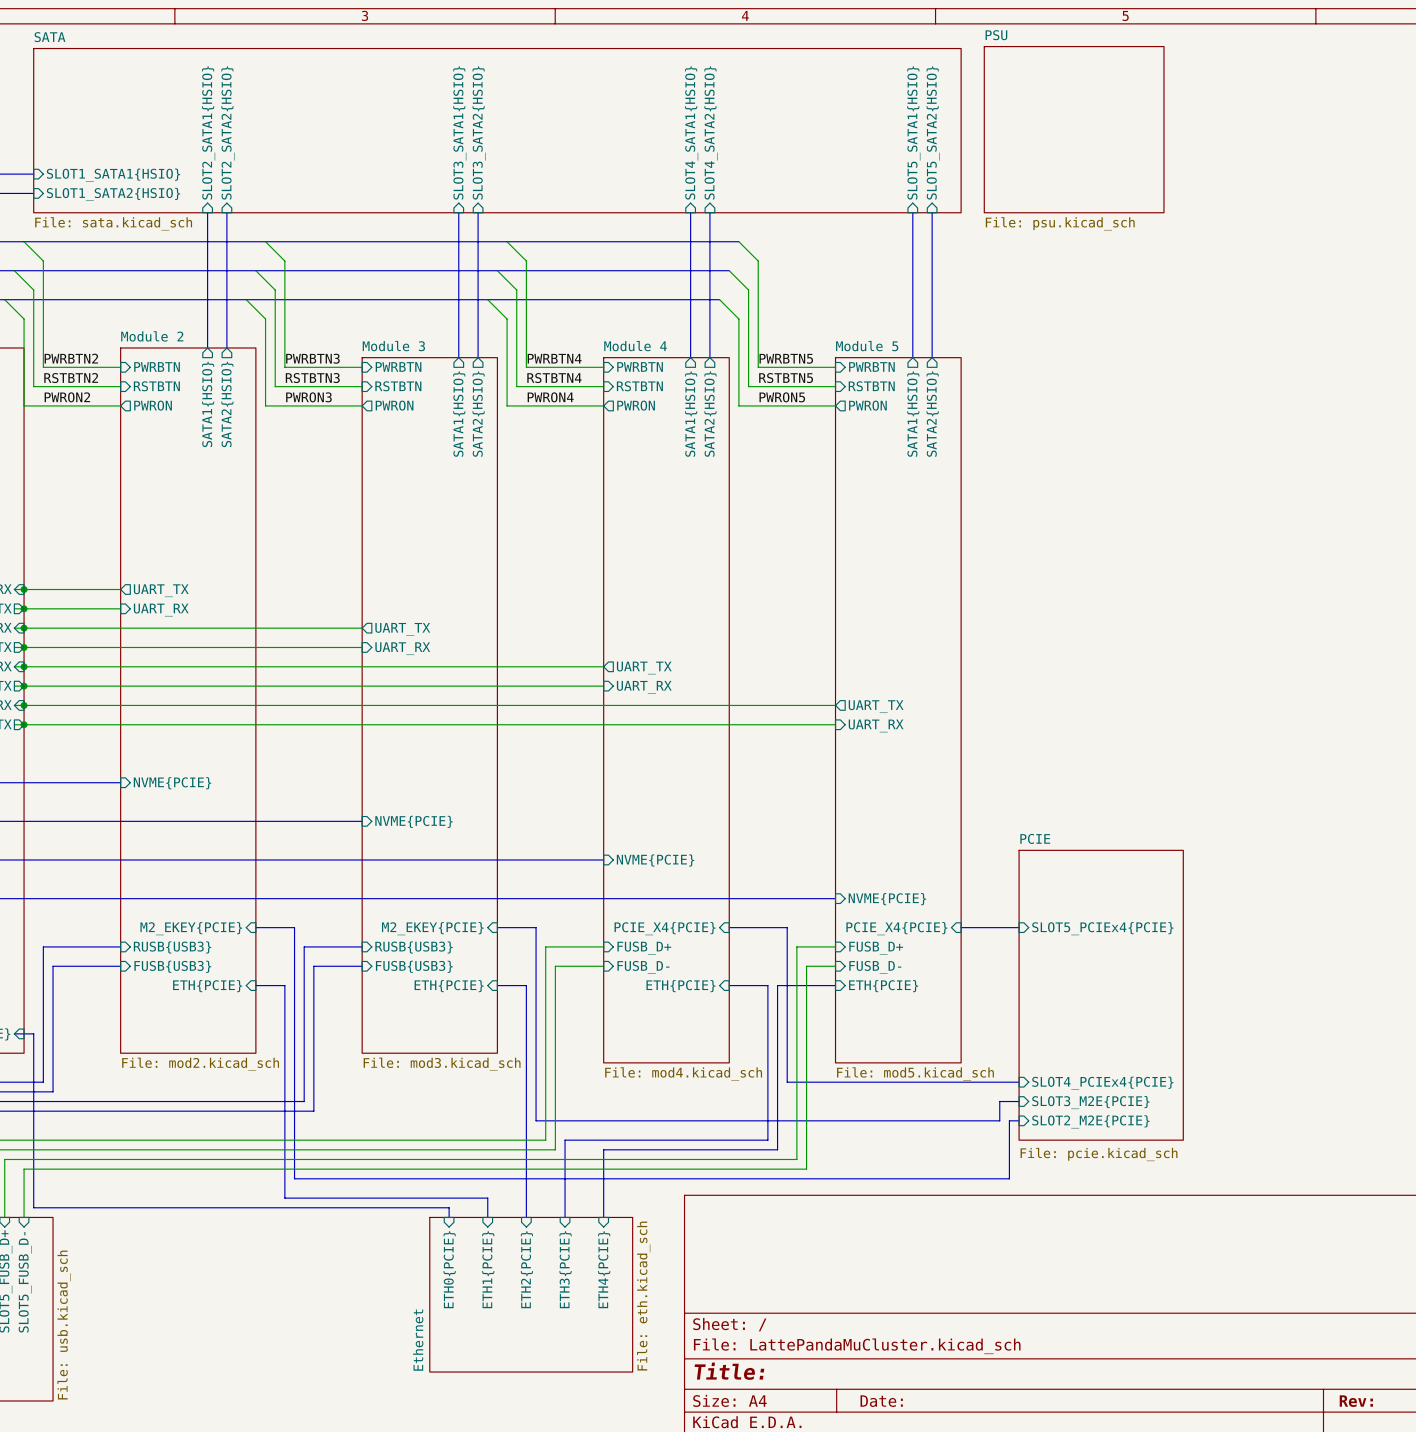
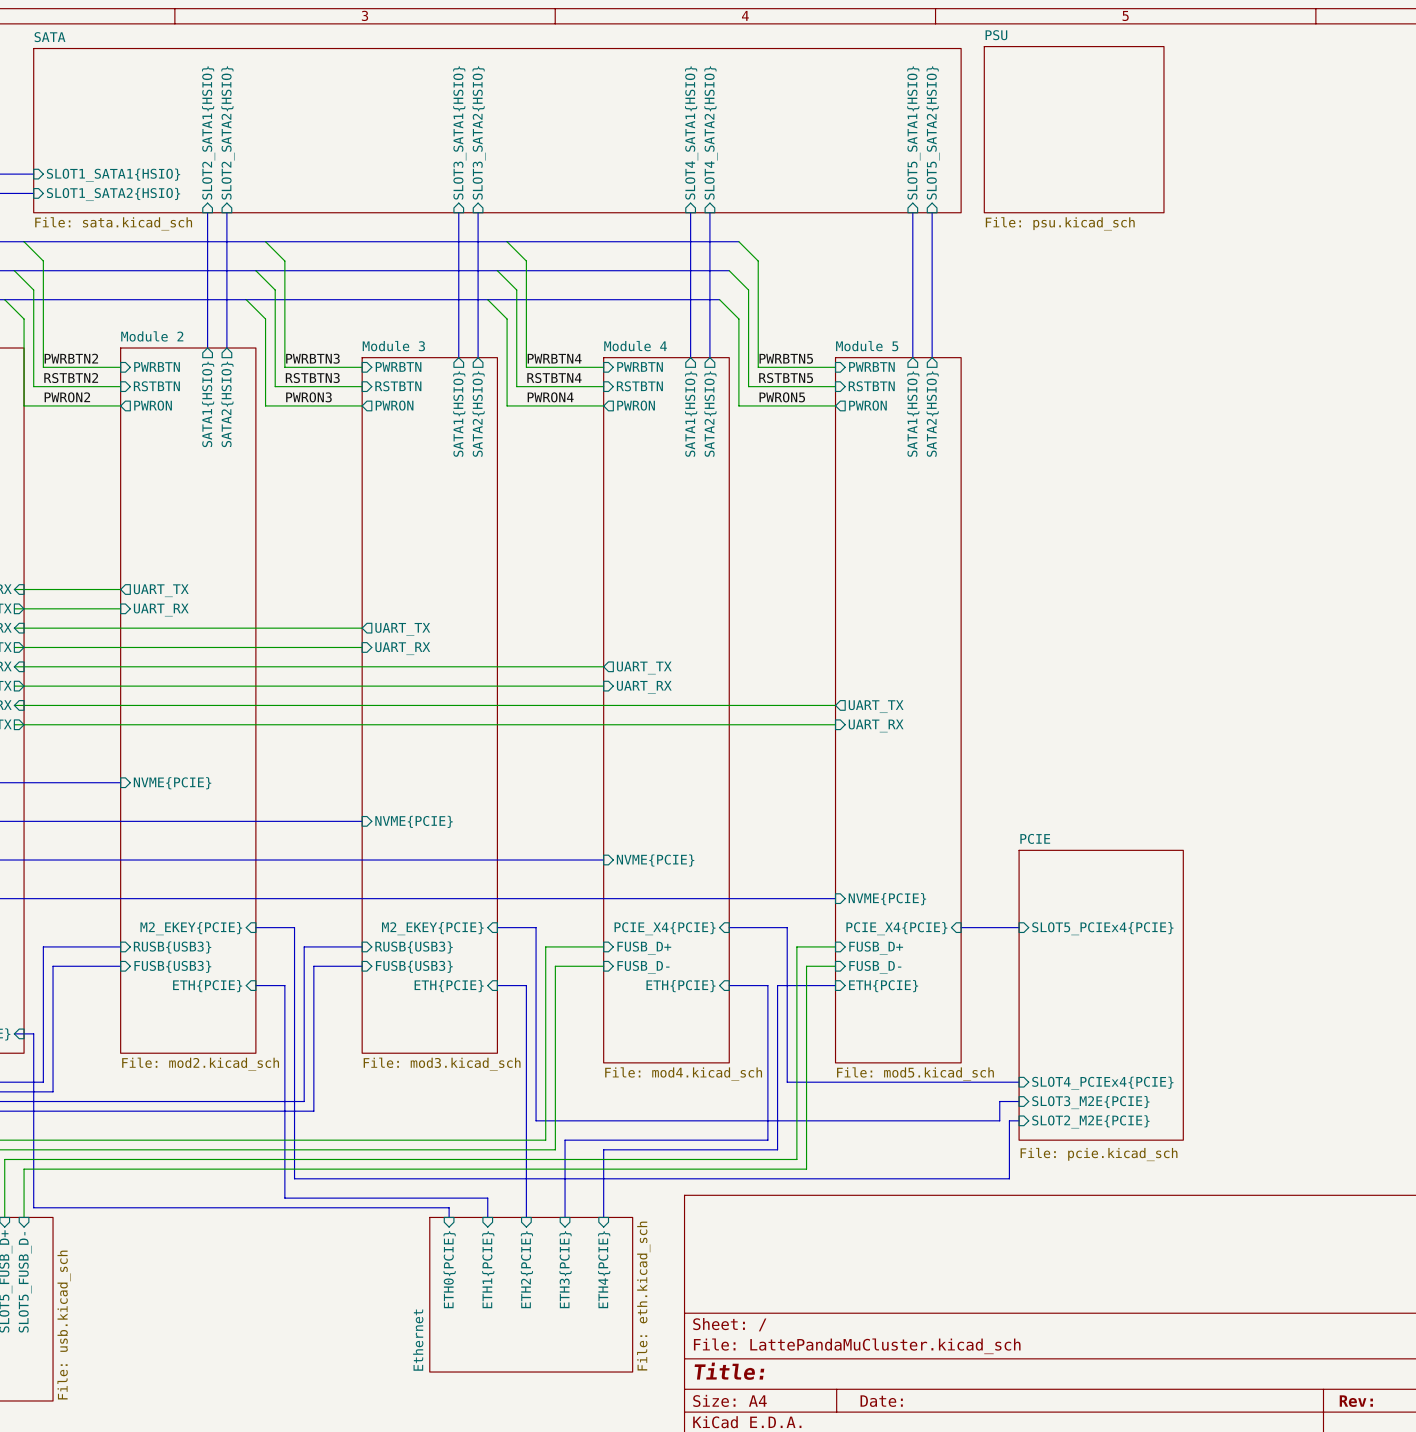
junction: (24, 589) -> none
junction: (24, 608) -> none
junction: (24, 628) -> none
junction: (24, 647) -> none
junction: (24, 666) -> none
junction: (24, 686) -> none
junction: (24, 705) -> none
junction: (24, 724) -> none

